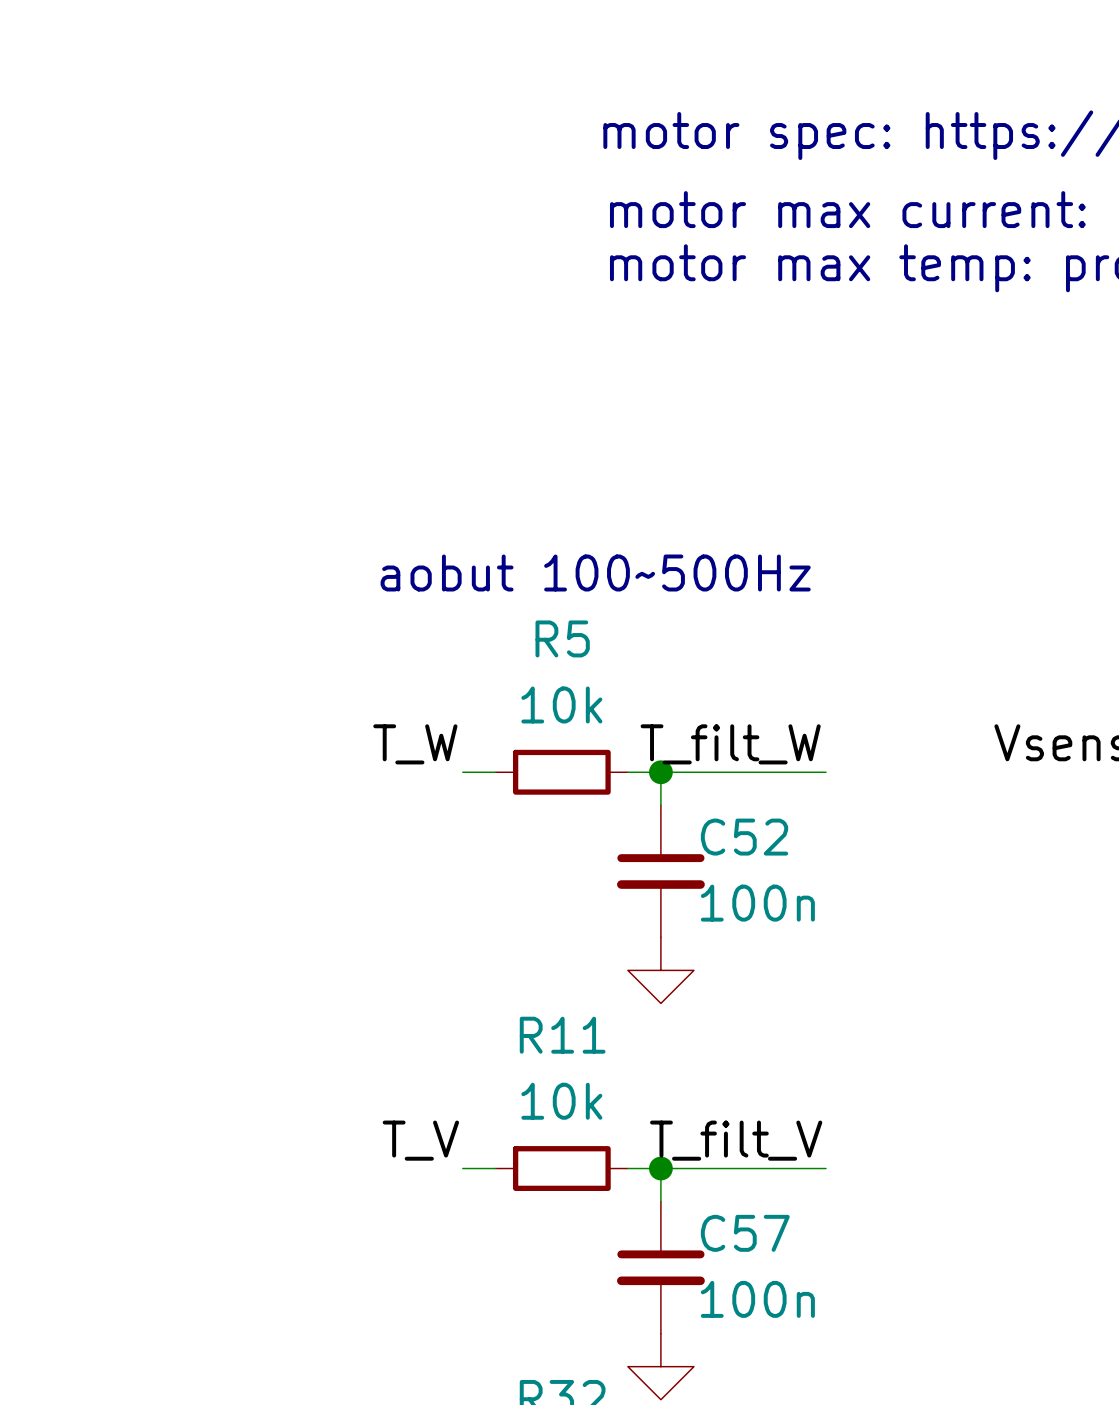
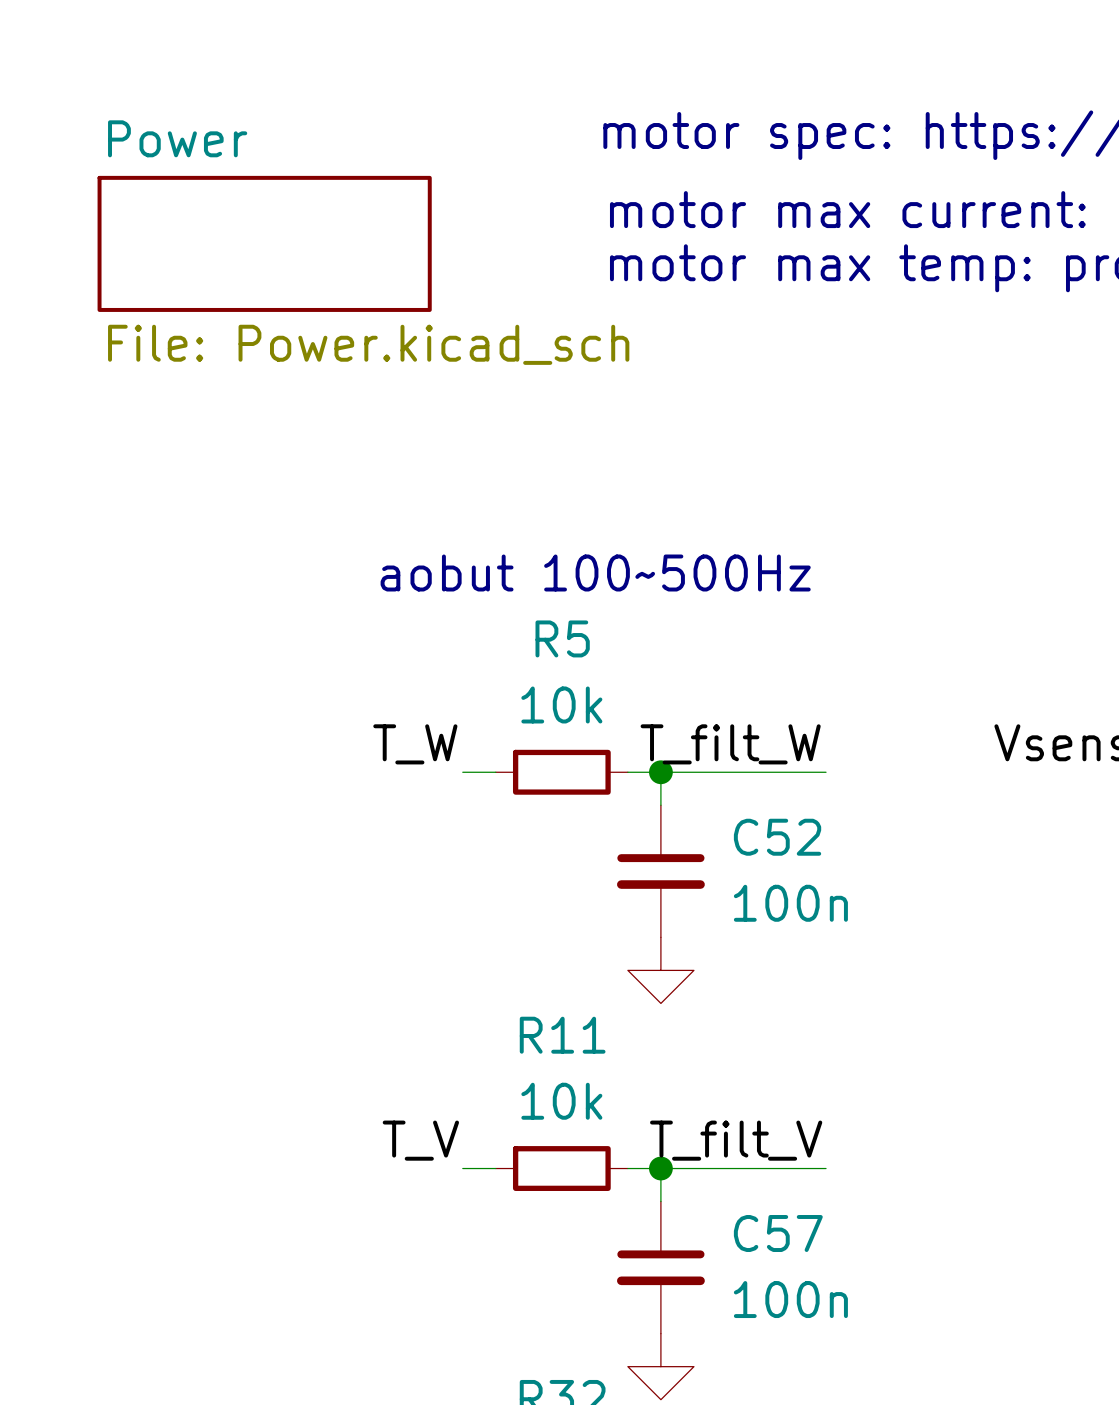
sheet Power: none -> File: Power.kicad_sch (264, 243)
C52 name position: C52 (744, 837) -> C52 (777, 837)
C52 value position: 100n (757, 903) -> 100n (790, 903)
C57 name position: C57 (745, 1233) -> C57 (778, 1233)
C57 value position: 100n (757, 1299) -> 100n (790, 1299)

